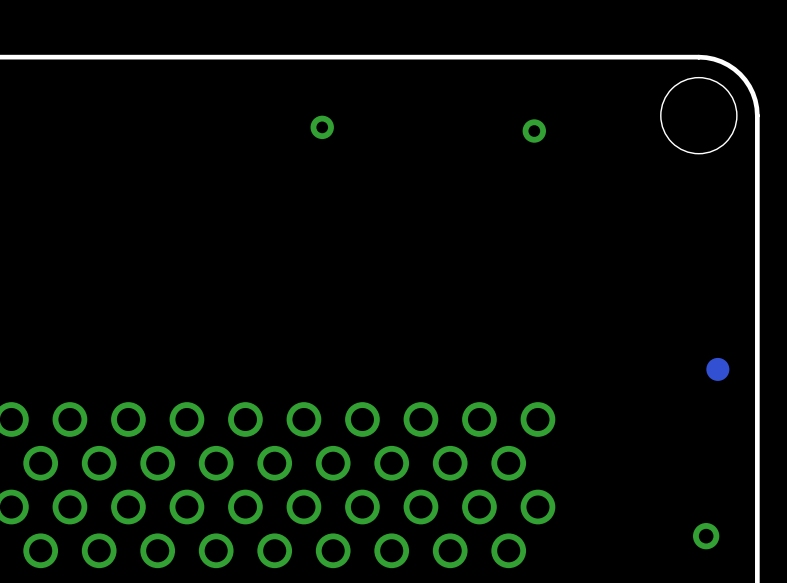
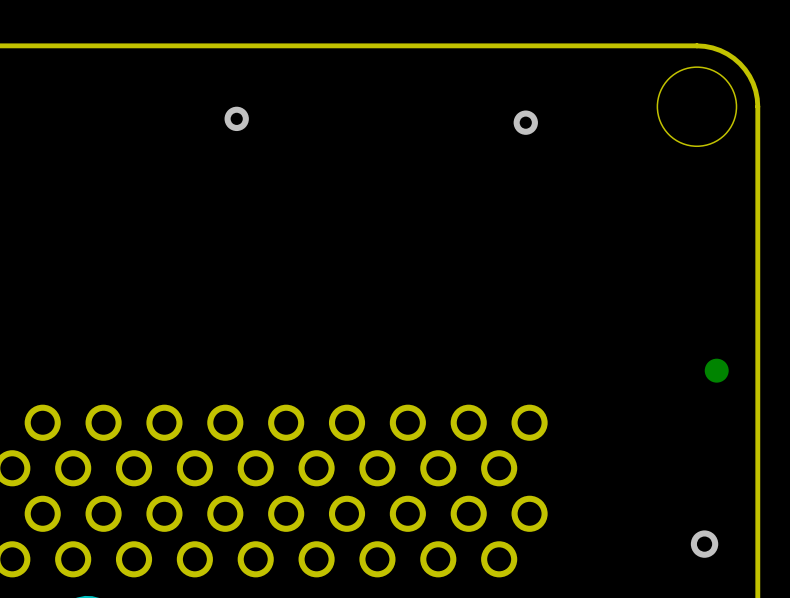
via position: (322, 127) -> (236, 118)

